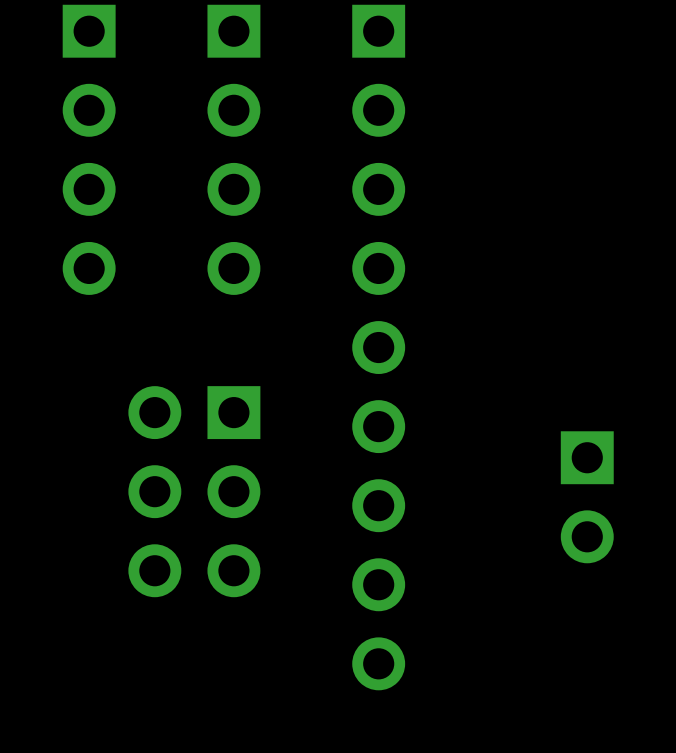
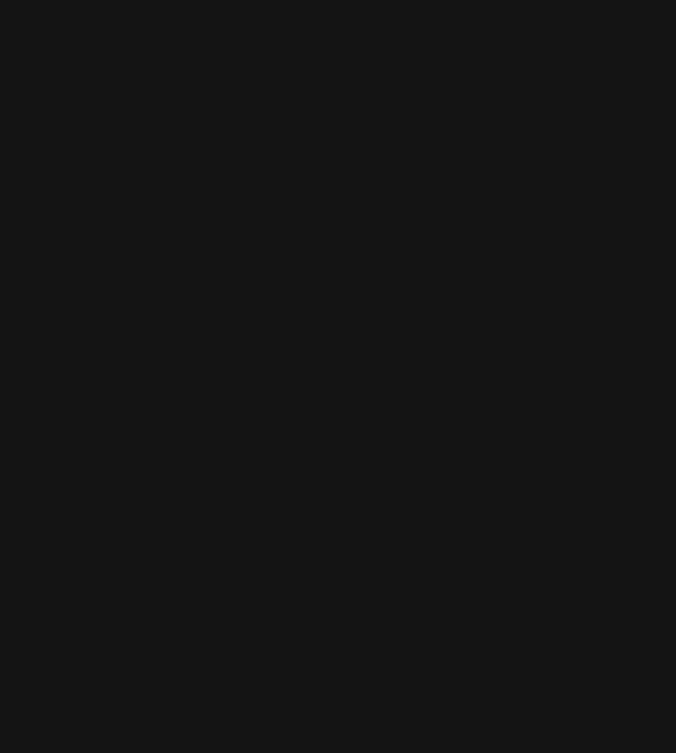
part: (89, 149) -> none
part: (233, 149) -> none
part: (378, 347) -> none
part: (194, 491) -> none
part: (587, 497) -> none

